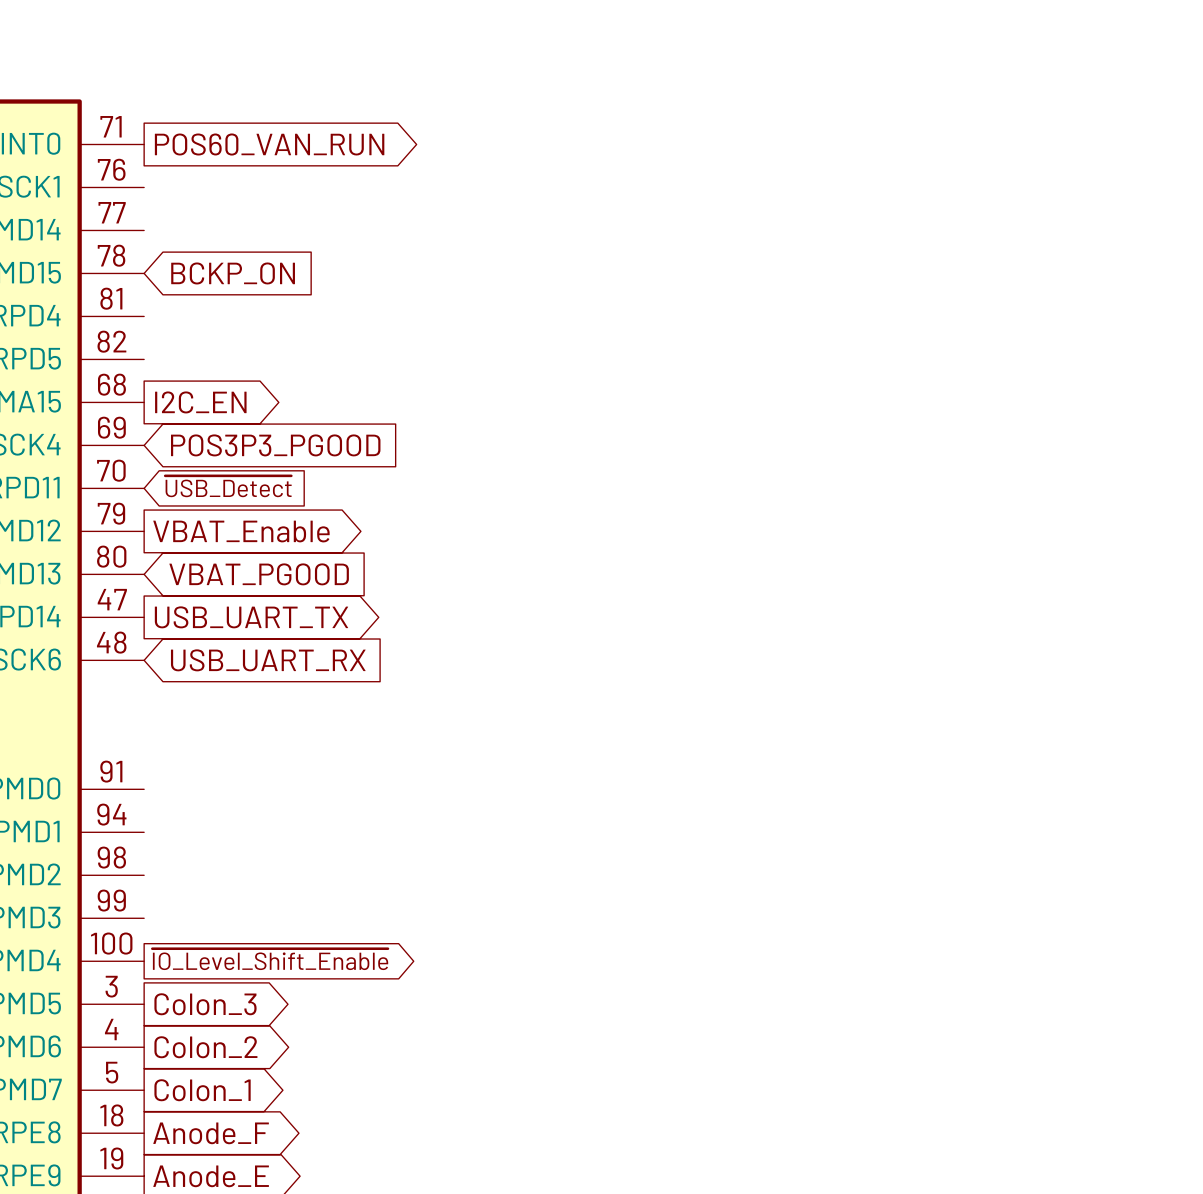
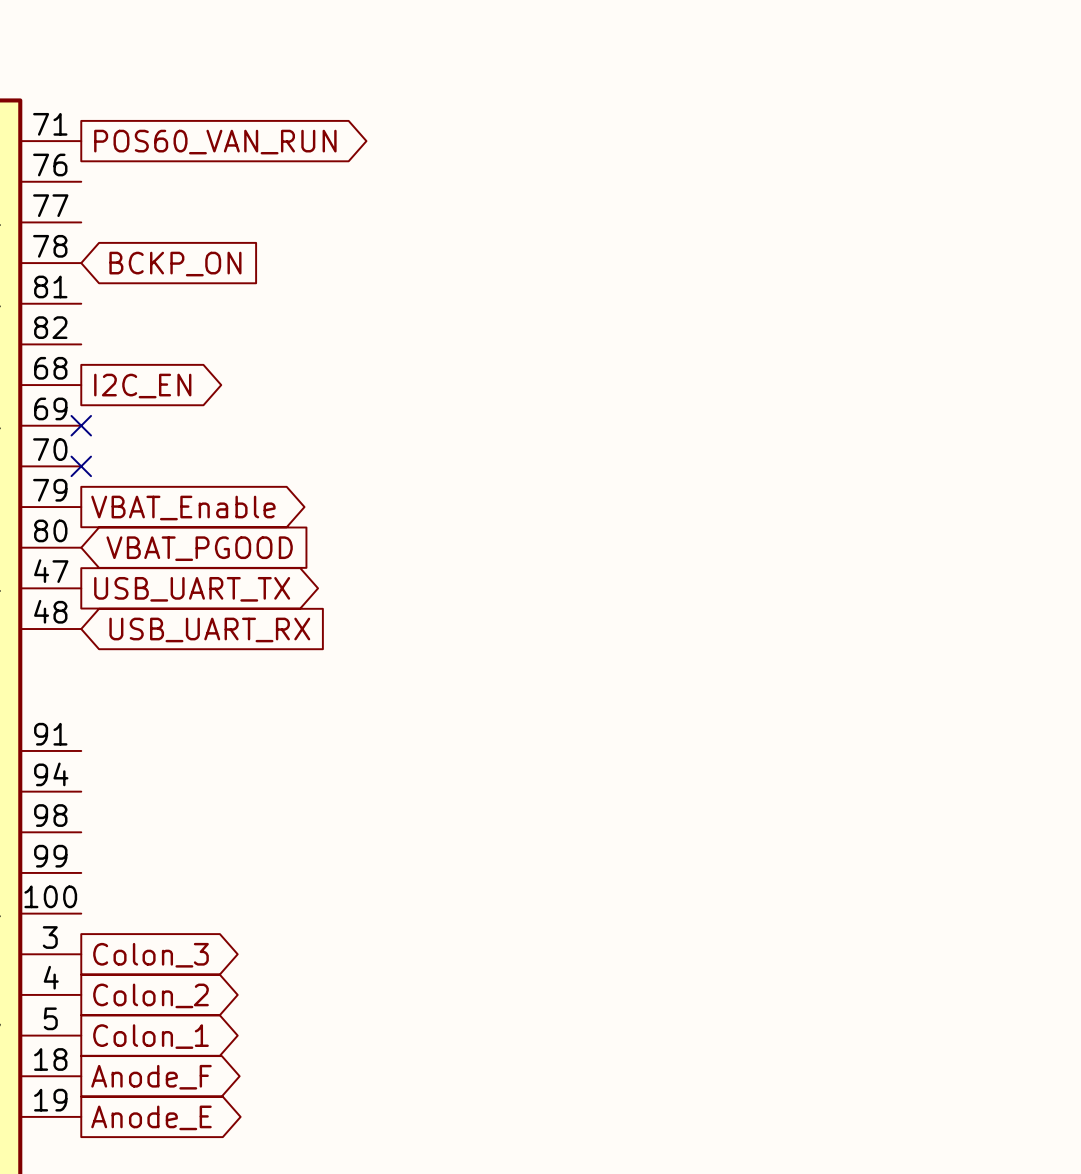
no-connect mark: none -> (81, 425)
global label: POS3P3_PGOOD (275, 445) -> none
global label: ~{USB_Detect} (228, 486) -> none
no-connect mark: none -> (81, 466)
global label: ~{IO_Level_Shift_Enable} (270, 959) -> none

